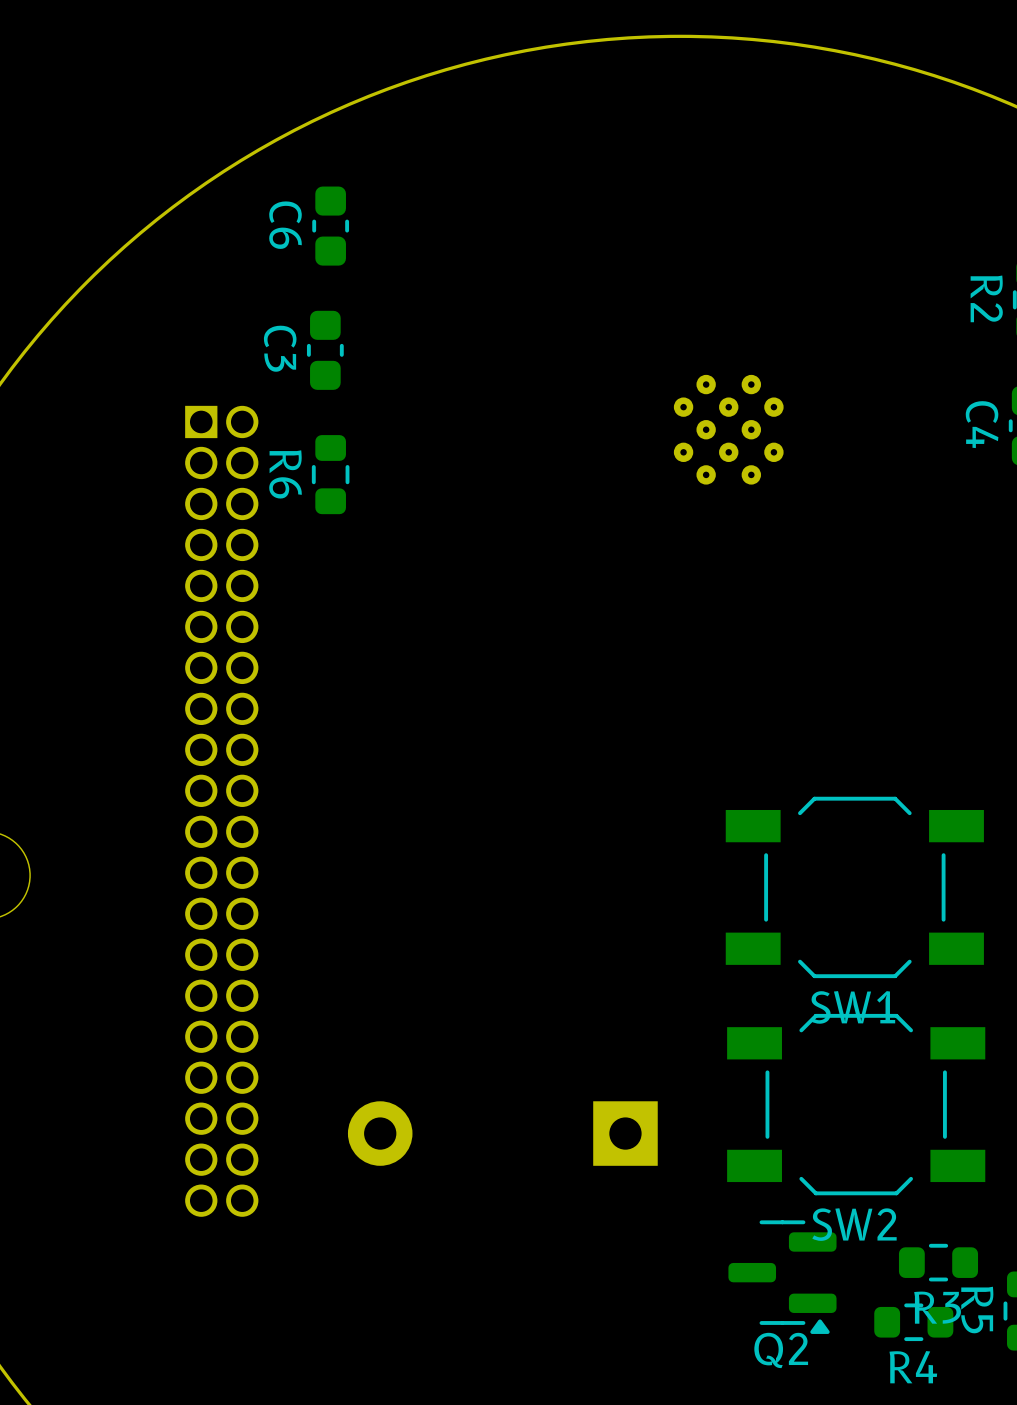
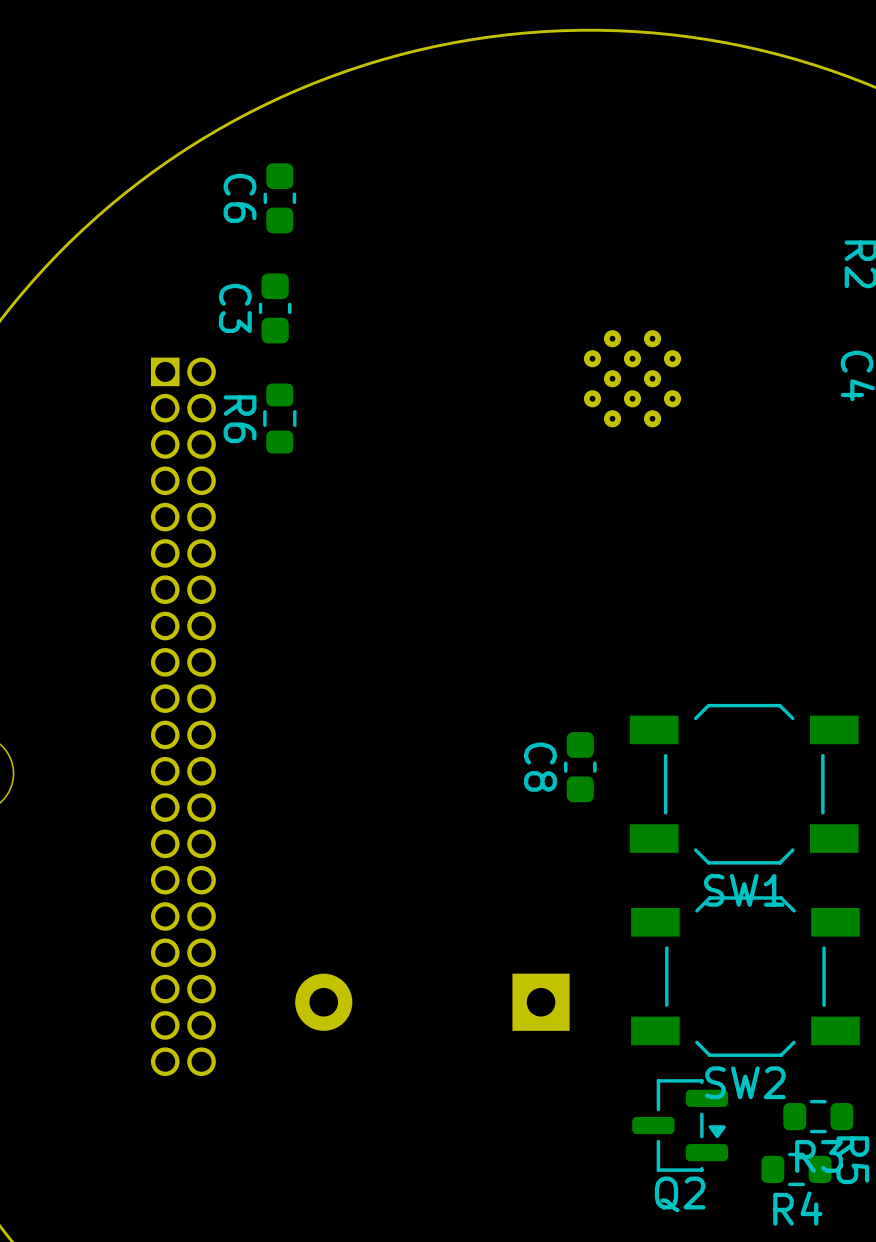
C8: none -> (580, 767)
Q2 footprint: [728, 1220, 837, 1334] -> [632, 1079, 729, 1172]

